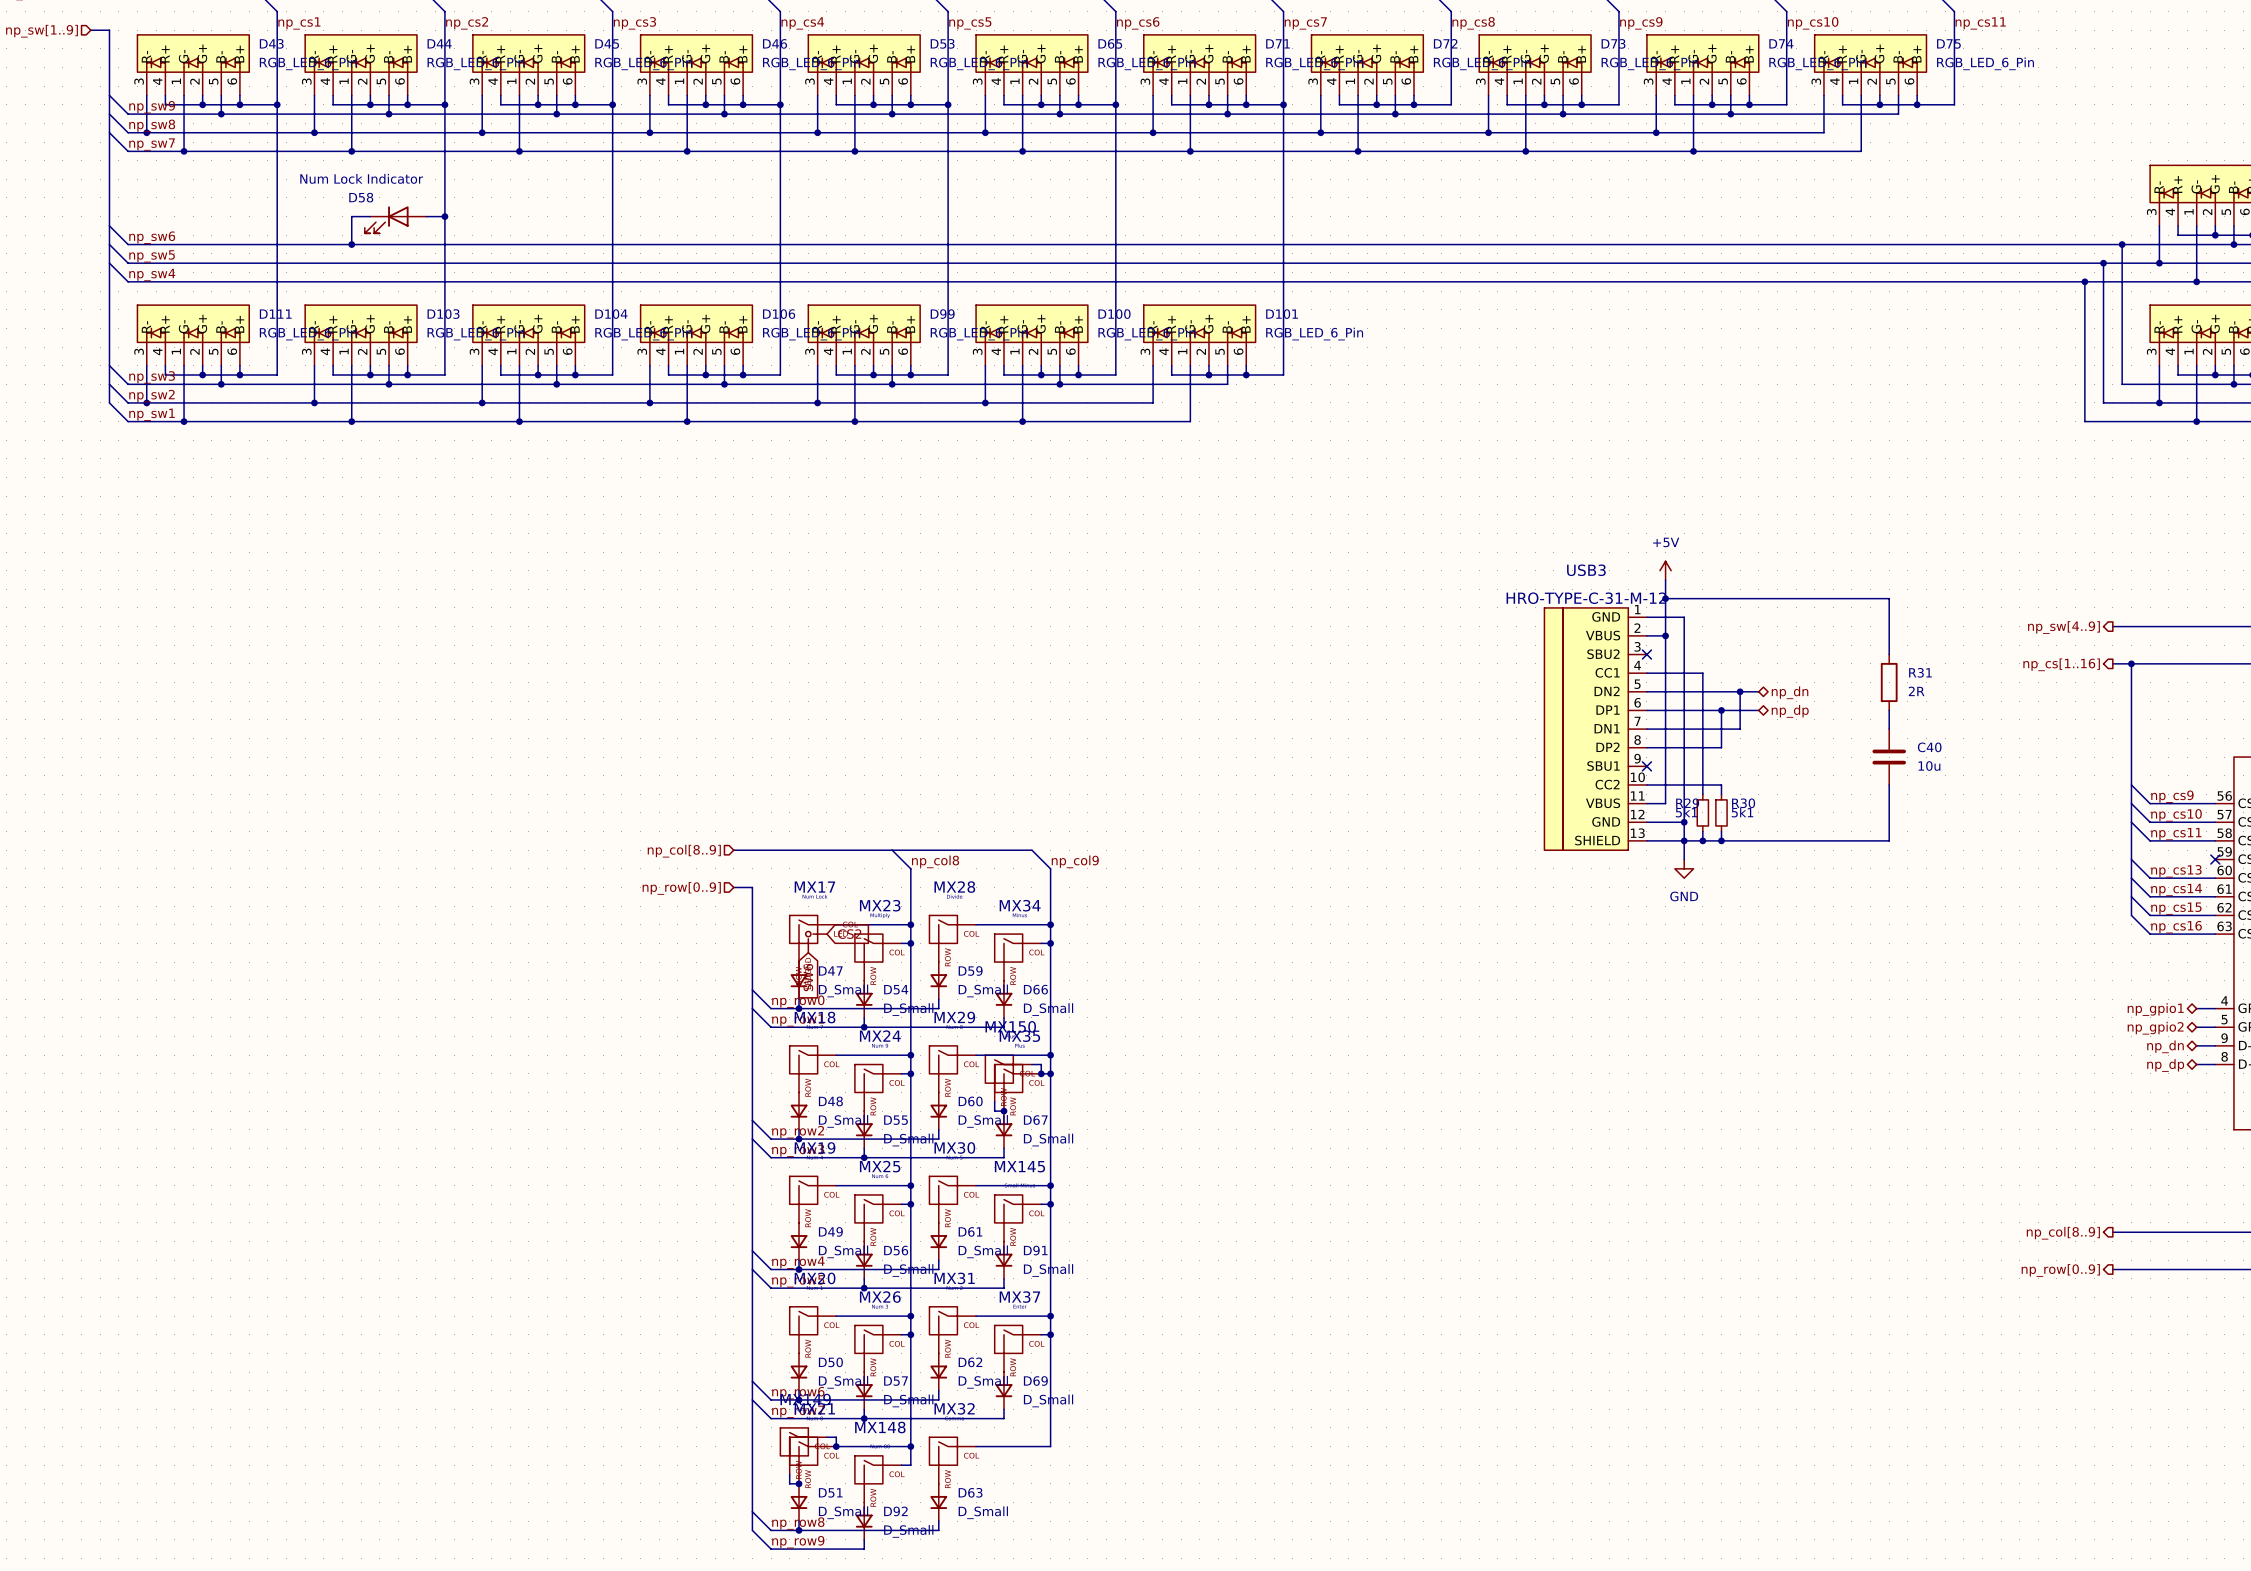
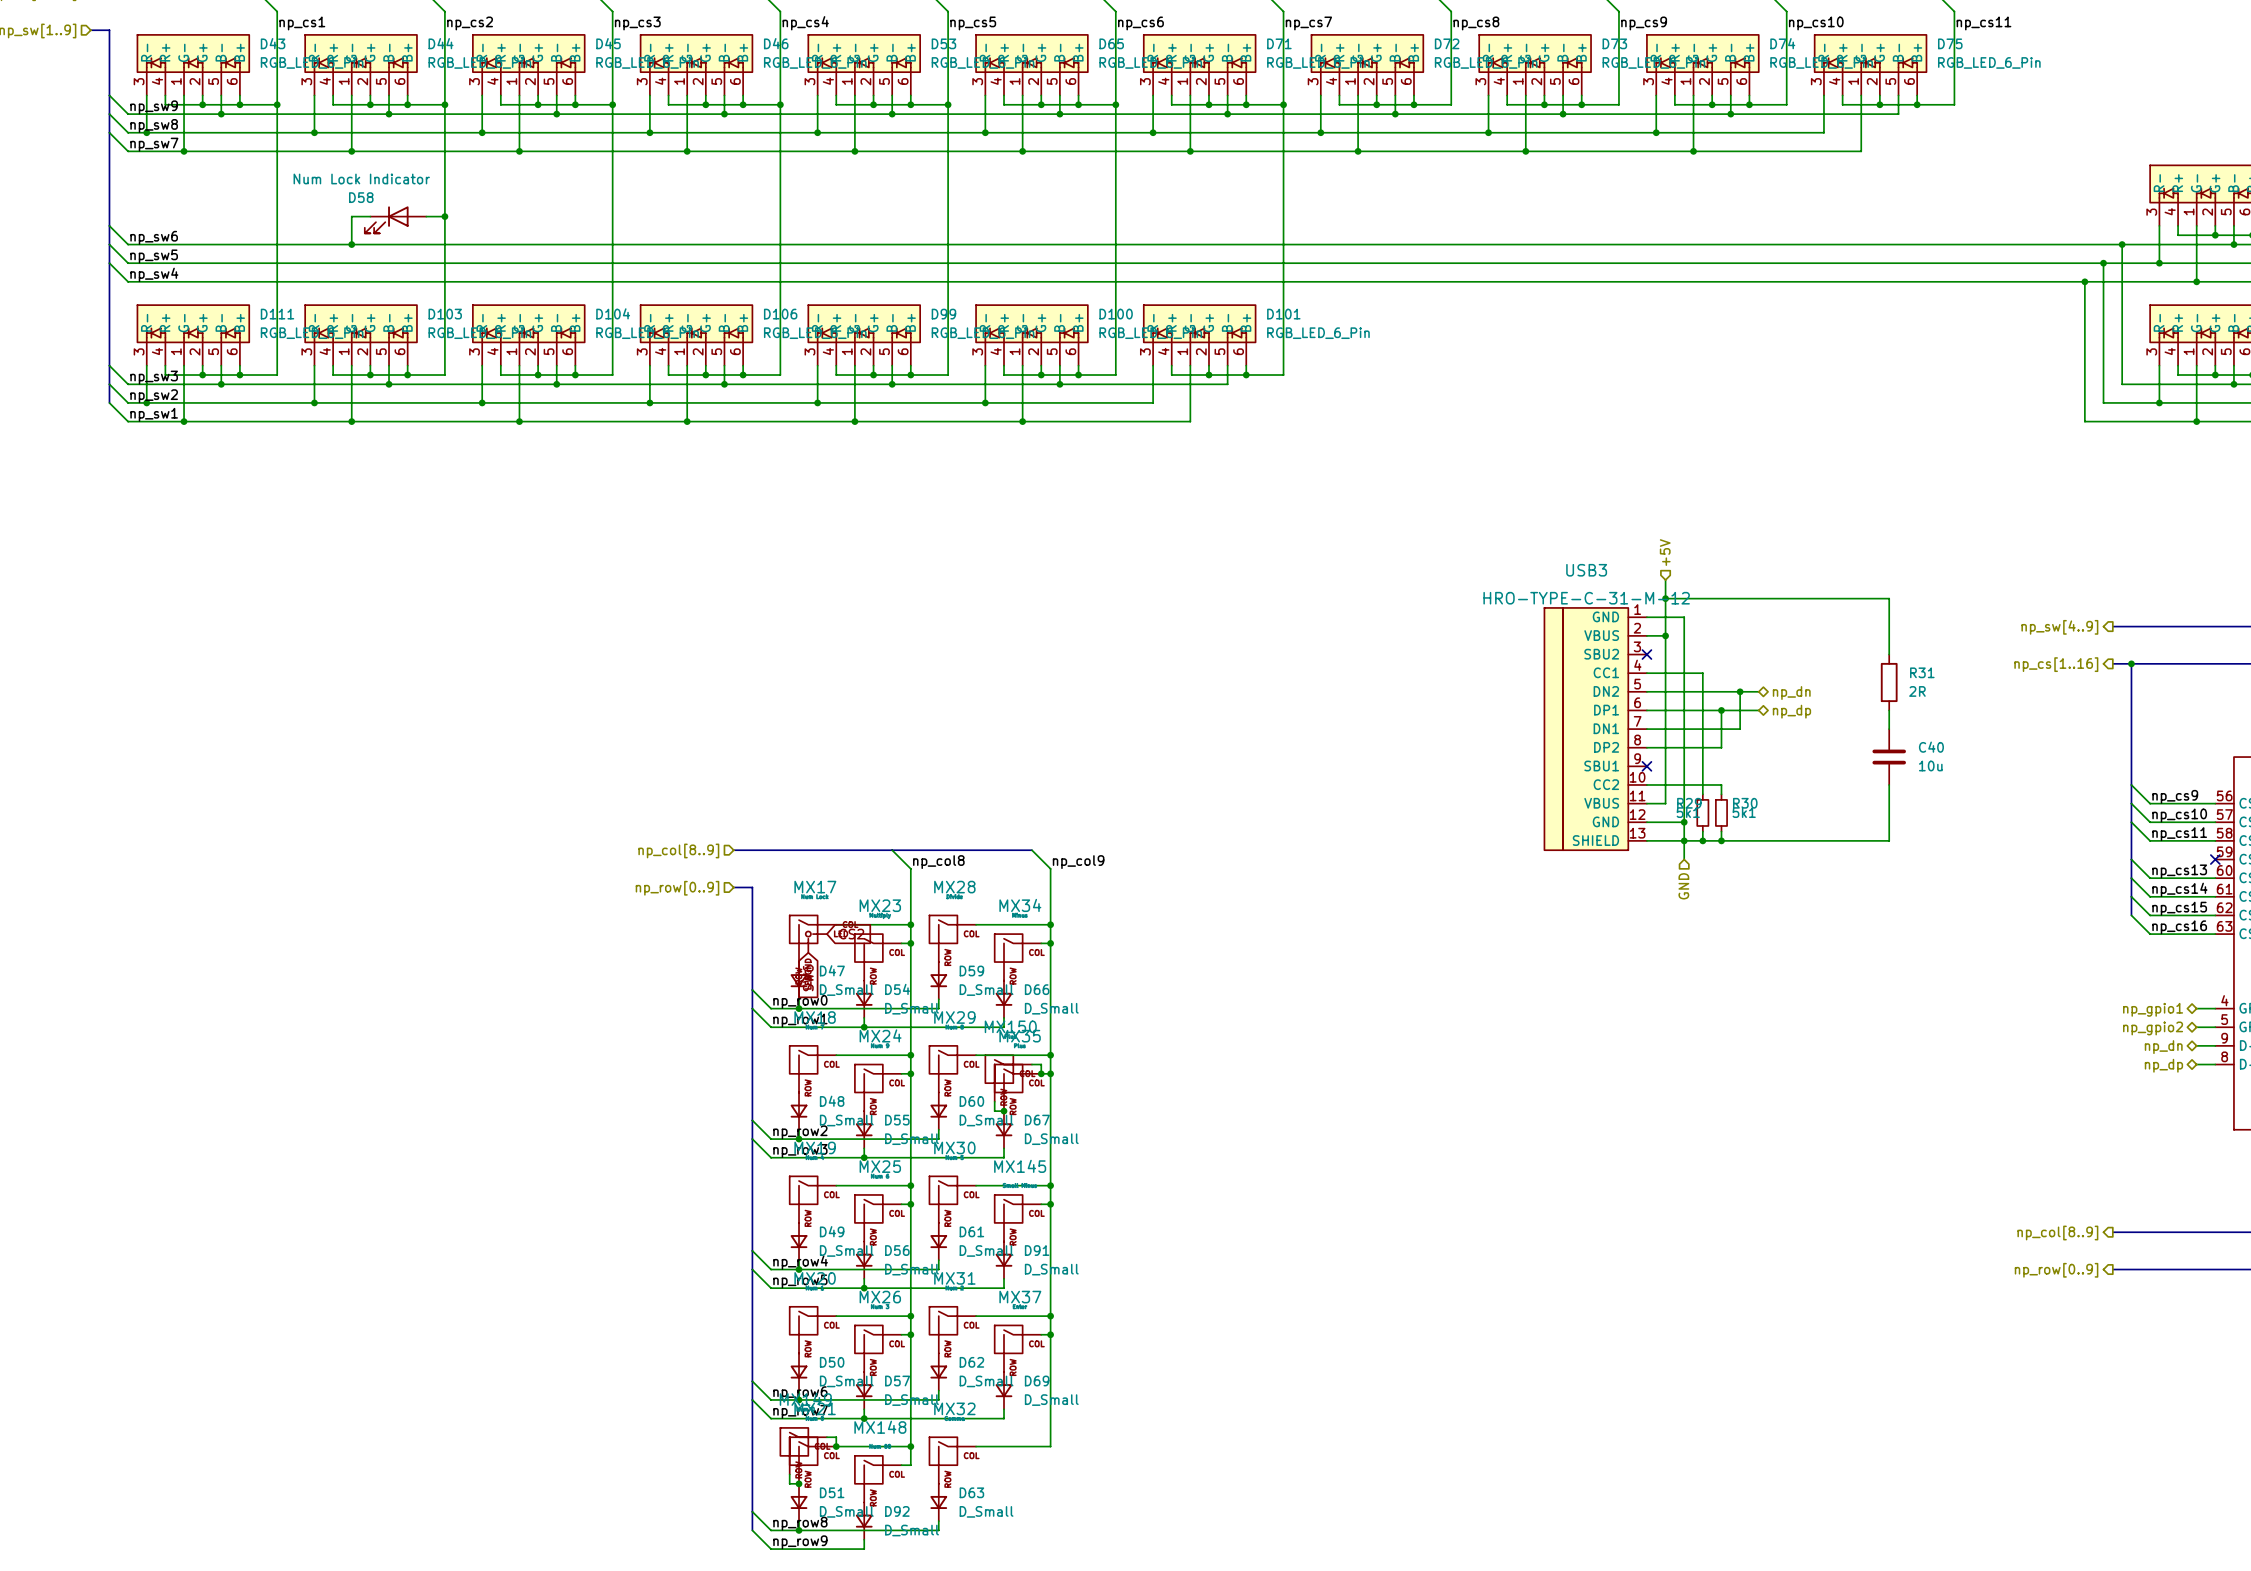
hierarchical label: none -> +5V (1665, 552)
power symbol: +5V (1665, 570) -> none
power symbol: GND (1684, 868) -> none
hierarchical label: none -> GND (1683, 886)

